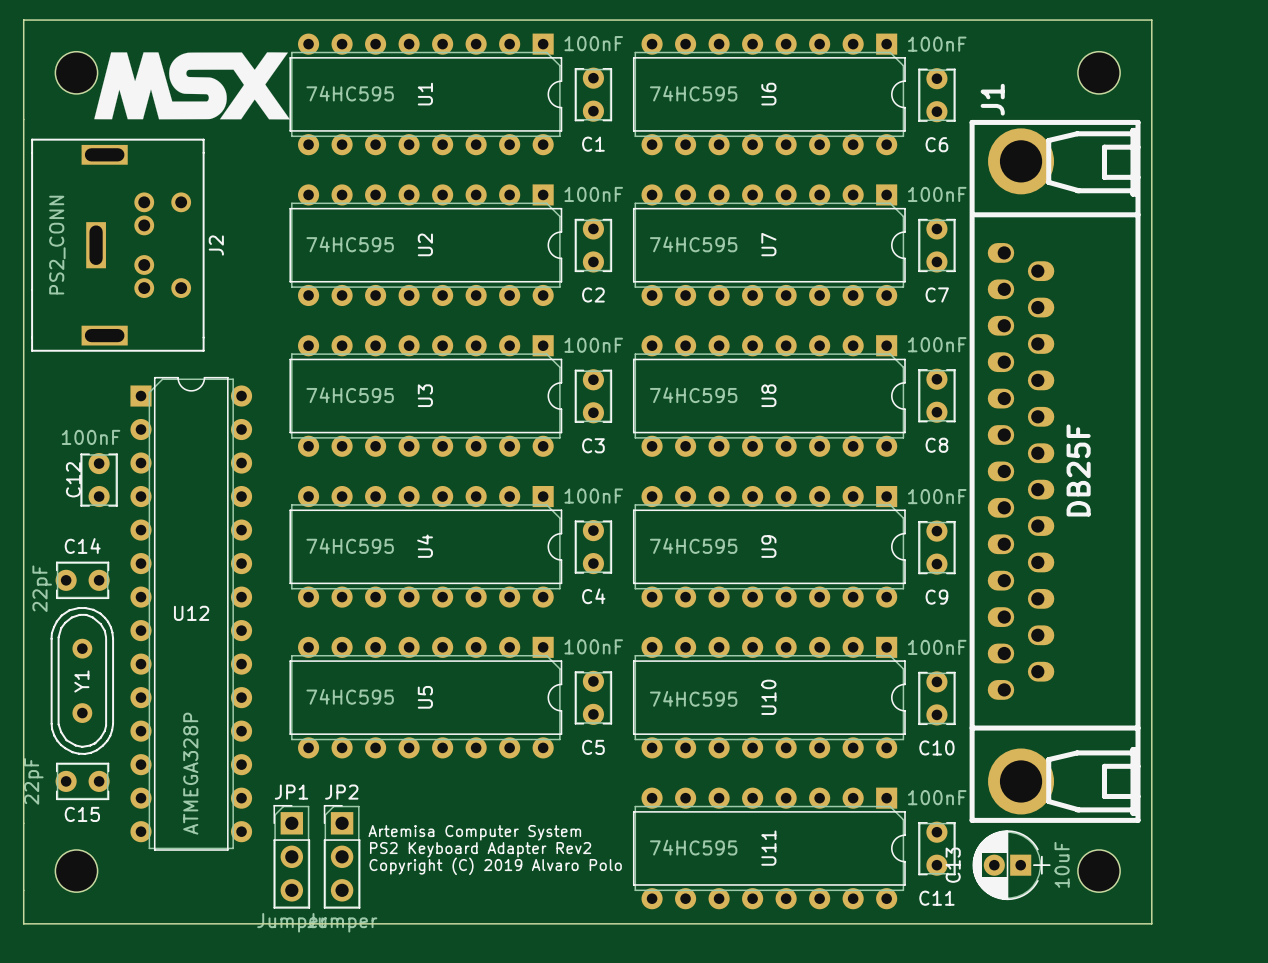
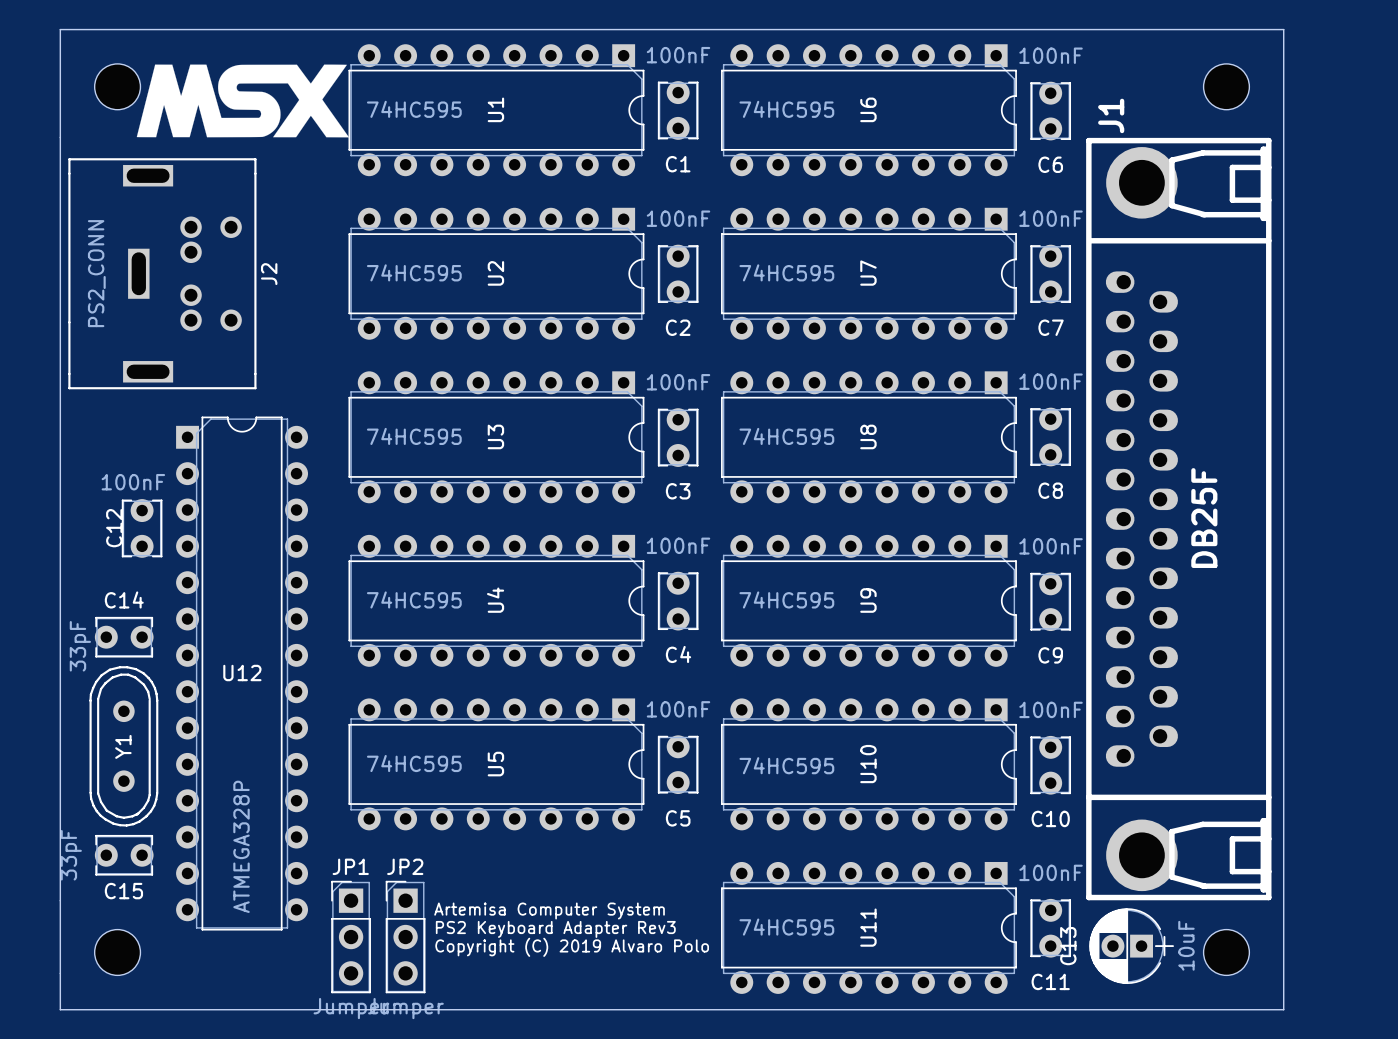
C14 value: 22pF (42, 588) -> 33pF (80, 646)
C15 value: 22pF (33, 781) -> 33pF (71, 855)
text: PS2 Keyboard Adapter Rev2 (480, 849) -> PS2 Keyboard Adapter Rev3 (555, 929)

